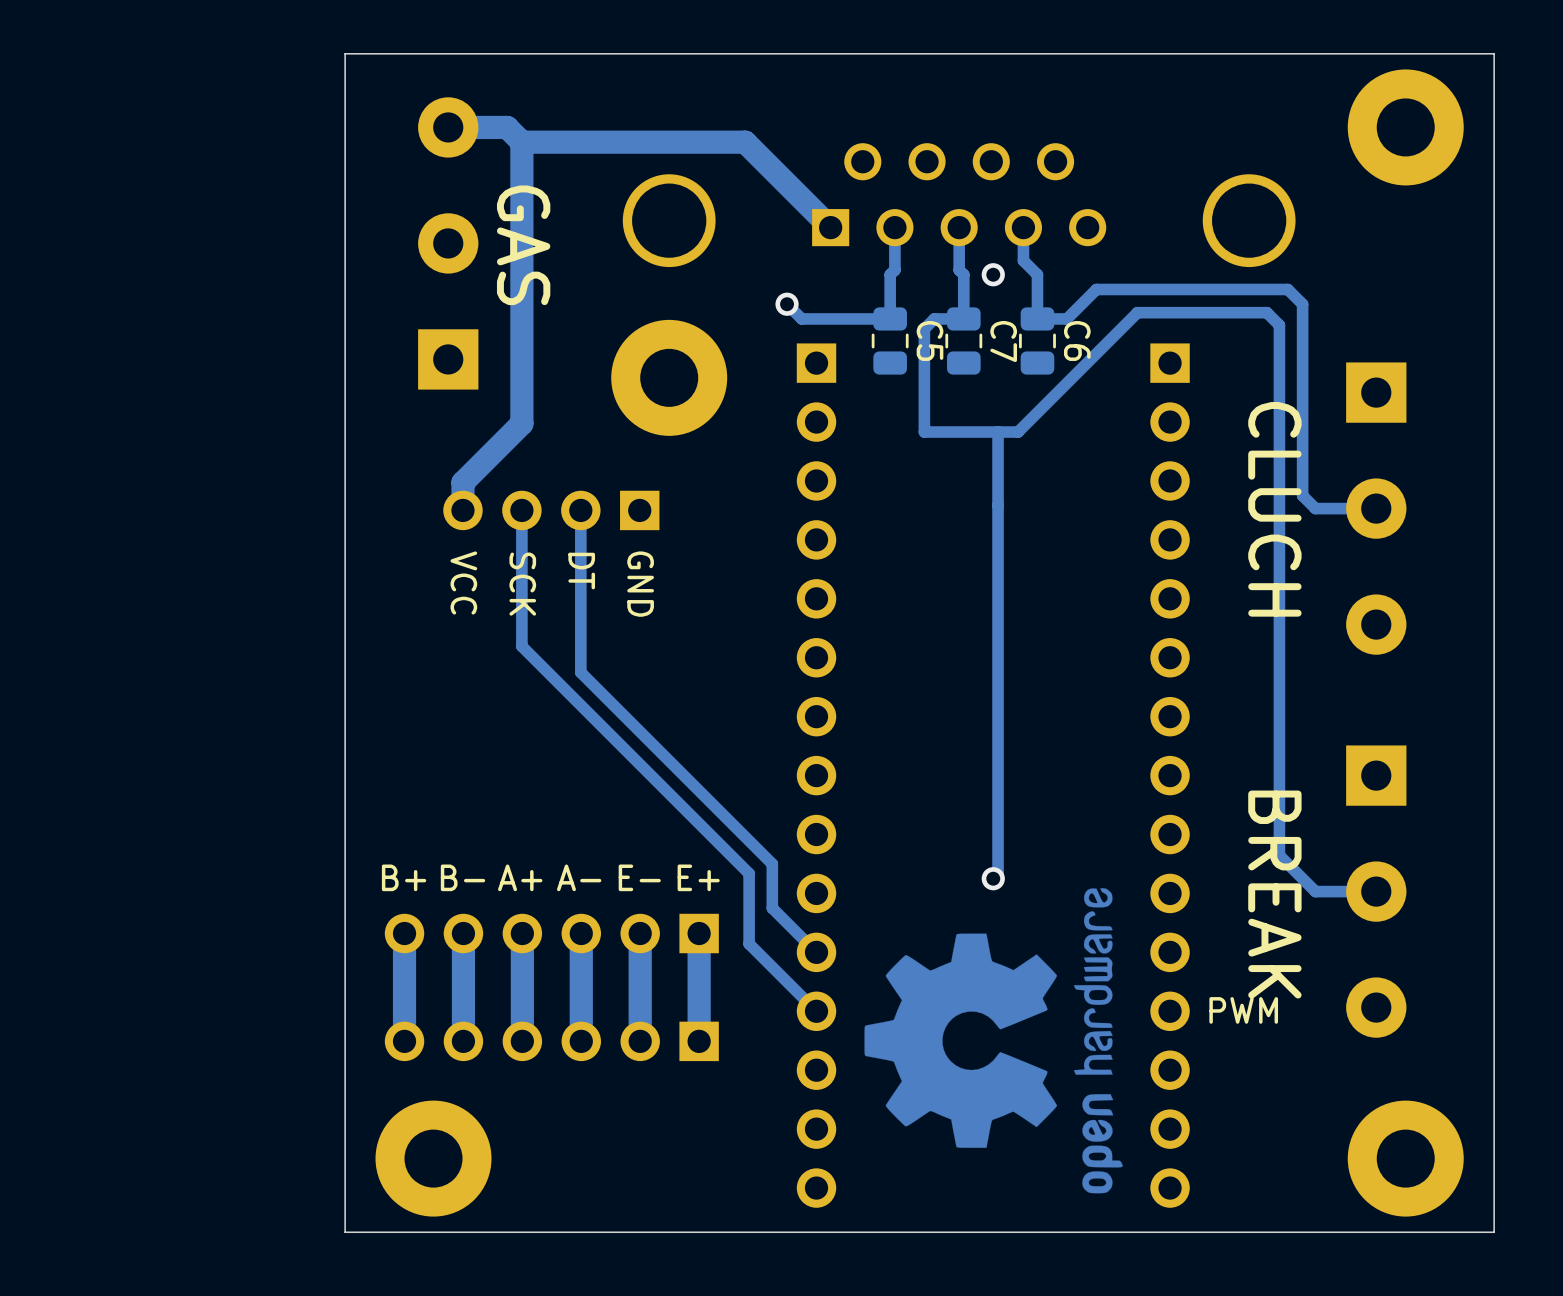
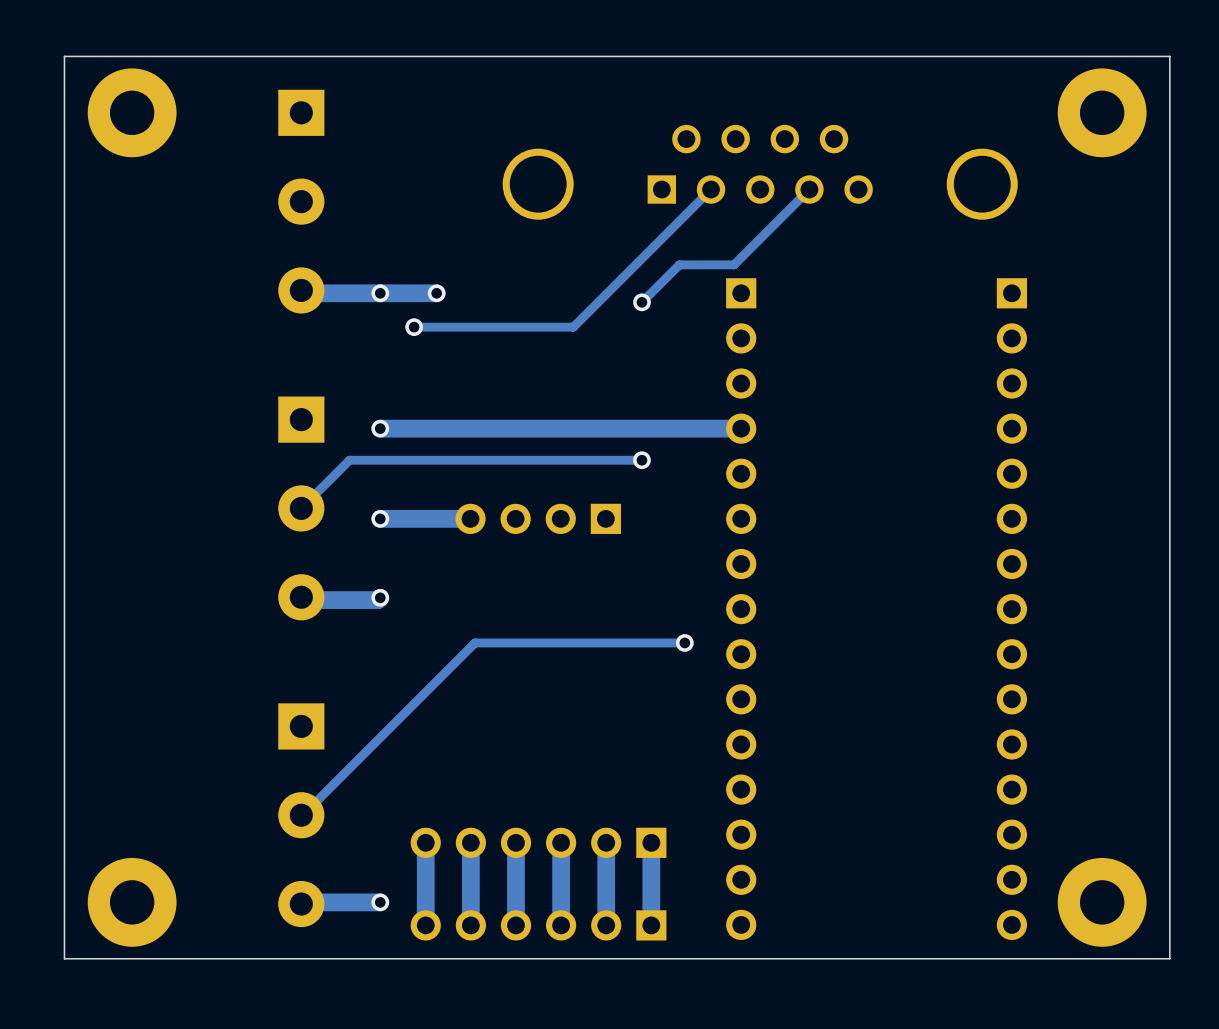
board edge: (345, 53) (345, 1232) -> (290, 56) (64, 56) (64, 958) (290, 958)
part: none -> (132, 112)
track: (448, 127) (507, 127) (521, 142) -> none
track: (521, 142) (521, 423) (462, 482) (462, 510) -> none
track: (521, 142) (745, 142) (830, 227) -> none
track: (894, 227) (894, 270) (890, 274) (890, 318) (801, 318) (787, 304) -> (711, 189) (573, 327) (414, 327)
track: (959, 227) (959, 270) (963, 274) (963, 318) (934, 318) (924, 328) (924, 432) (1018, 432) (1137, 312) (1266, 312) (1279, 325) (1279, 855) (1315, 891) (1376, 891) -> none
track: (1023, 227) (1023, 260) (1037, 274) (1037, 318) (1066, 318) (1096, 289) (1287, 289) (1302, 304) (1302, 495) (1315, 508) (1376, 508) -> (809, 189) (734, 264) (679, 264) (641, 302)
part rotation: 0° (448, 243) -> 180° (301, 201)
text: GAS (523, 245) -> none
via: (993, 274) -> none
via position: (787, 304) -> (641, 302)
C5: (890, 340) -> none
C7: (963, 340) -> none
C6: (1037, 340) -> none
via: none -> (380, 293)
track: none -> (436, 293) (301, 293)
via: none -> (436, 293)
part: (669, 377) -> none
via: none -> (414, 327)
track: (998, 432) (998, 873) (993, 878) -> none
part: (1376, 508) -> none
text: CLUCH (1274, 509) -> none
track: (521, 510) (521, 646) (749, 873) (749, 943) (816, 1011) -> none
part position: (551, 510) -> (538, 518)
track: (580, 510) (580, 672) (772, 863) (772, 908) (816, 952) -> none
via: none -> (380, 428)
track: none -> (741, 428) (380, 428)
text: DT (581, 571) -> none
track: none -> (641, 460) (349, 460) (301, 508)
via: none -> (641, 460)
text: VCC (463, 582) -> none
text: SCK (522, 584) -> none
text: GND (640, 584) -> none
part: none -> (301, 508)
via: none -> (380, 518)
track: none -> (470, 518) (380, 518)
track: none -> (380, 597) (378, 600) (301, 600)
via: none -> (380, 597)
part: (816, 775) -> none
part: none -> (741, 609)
part: (1170, 775) -> none
part: none -> (1011, 609)
track: none -> (684, 642) (475, 642) (301, 816)
via: none -> (684, 642)
text: B+ (404, 877) -> none
text: B- (462, 877) -> none
text: A+ (520, 877) -> none
text: A- (579, 877) -> none
text: E- (639, 877) -> none
text: E+ (698, 877) -> none
via: (993, 878) -> none
drawing: [864, 888, 1123, 1194] -> none
part: (1376, 891) -> none
text: BREAK (1274, 894) -> none
track: (404, 933) (404, 1041) -> (425, 842) (425, 925)
track: (463, 933) (463, 1041) -> (470, 842) (470, 925)
track: (522, 933) (522, 1041) -> (515, 842) (515, 925)
part: (551, 933) -> none
track: (581, 933) (581, 1041) -> (561, 842) (561, 925)
track: (640, 933) (640, 1041) -> (606, 842) (606, 925)
track: (699, 933) (699, 1041) -> (651, 842) (651, 925)
text: PWM (1243, 1010) -> none
part: (551, 1041) -> none
part: none -> (301, 815)
part: none -> (538, 842)
part position: (433, 1158) -> (132, 902)
track: none -> (380, 902) (305, 902) (301, 906)
via: none -> (380, 902)
part: none -> (538, 925)

